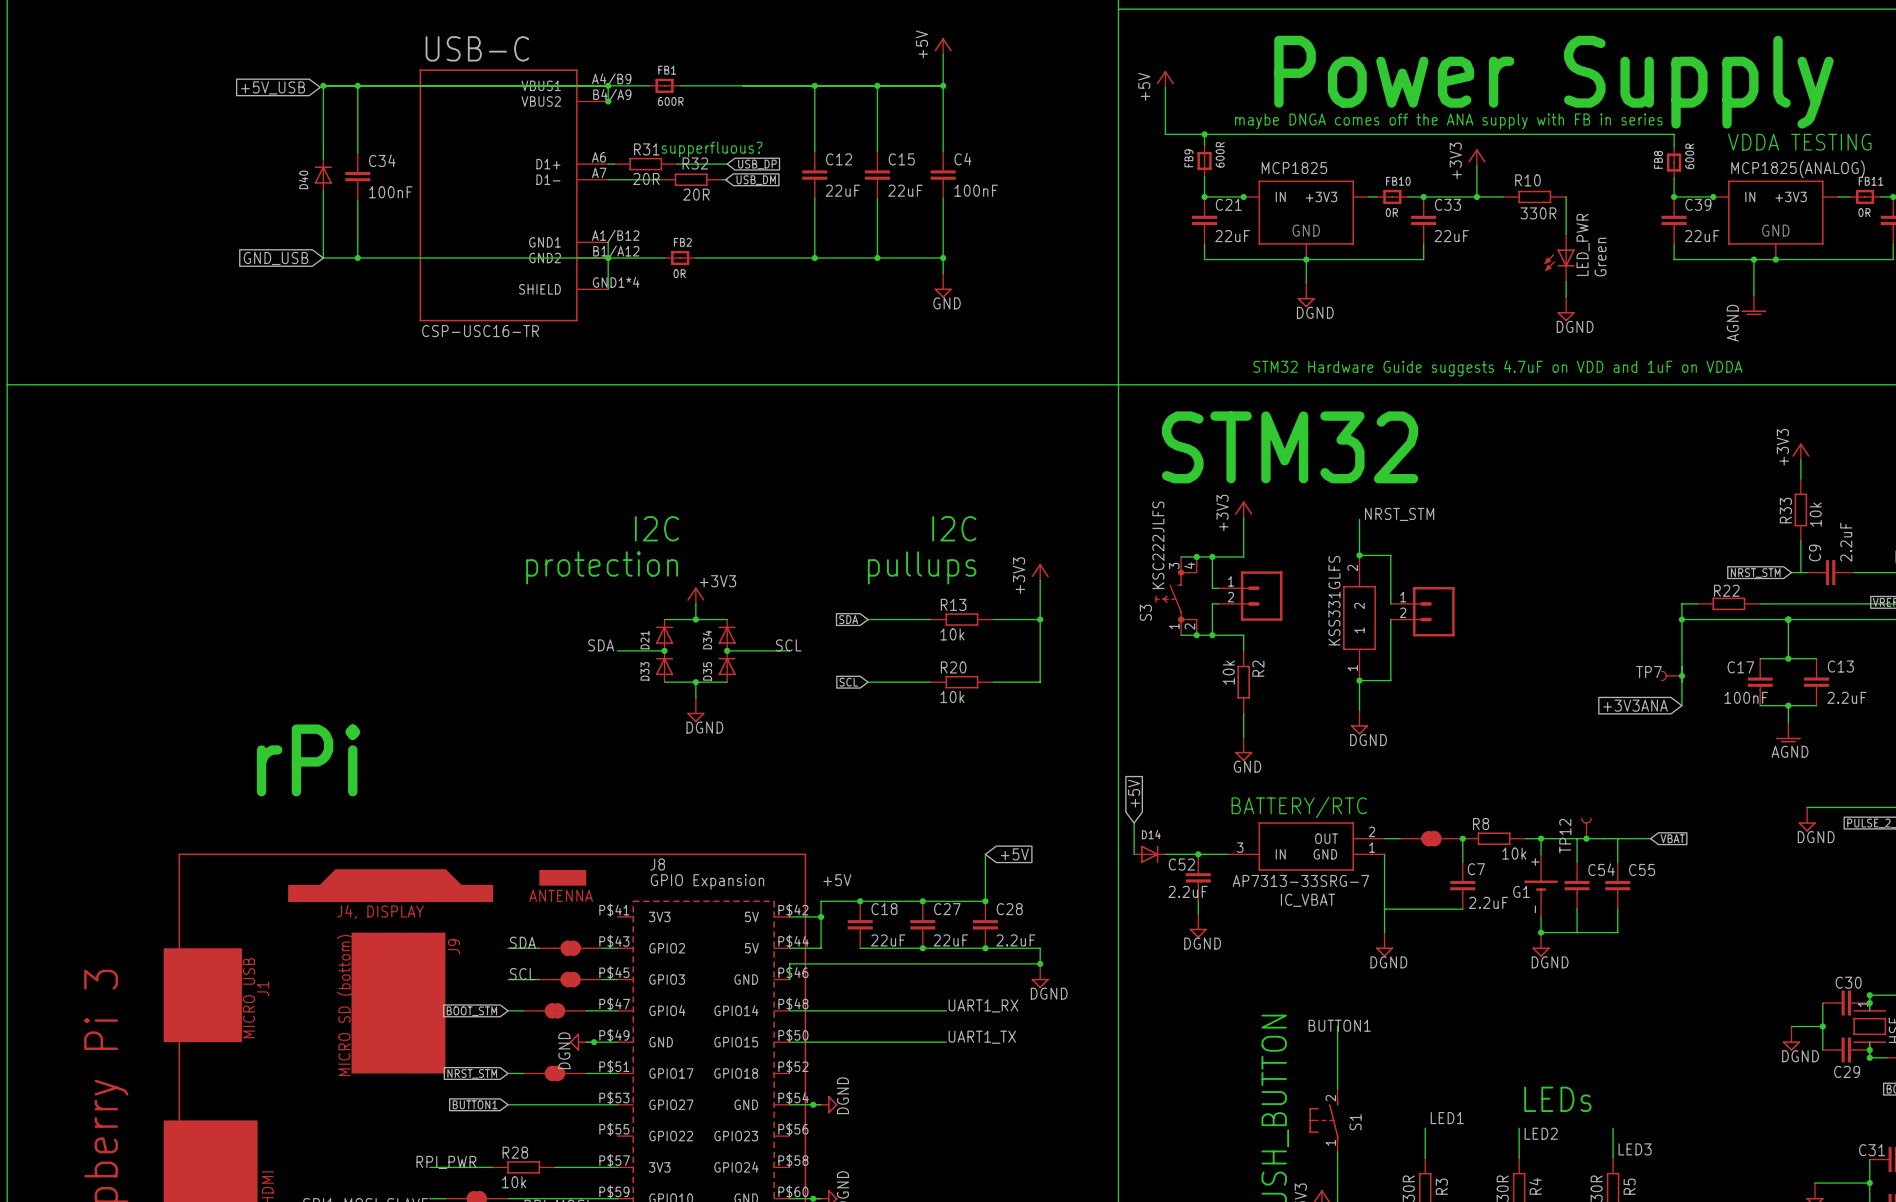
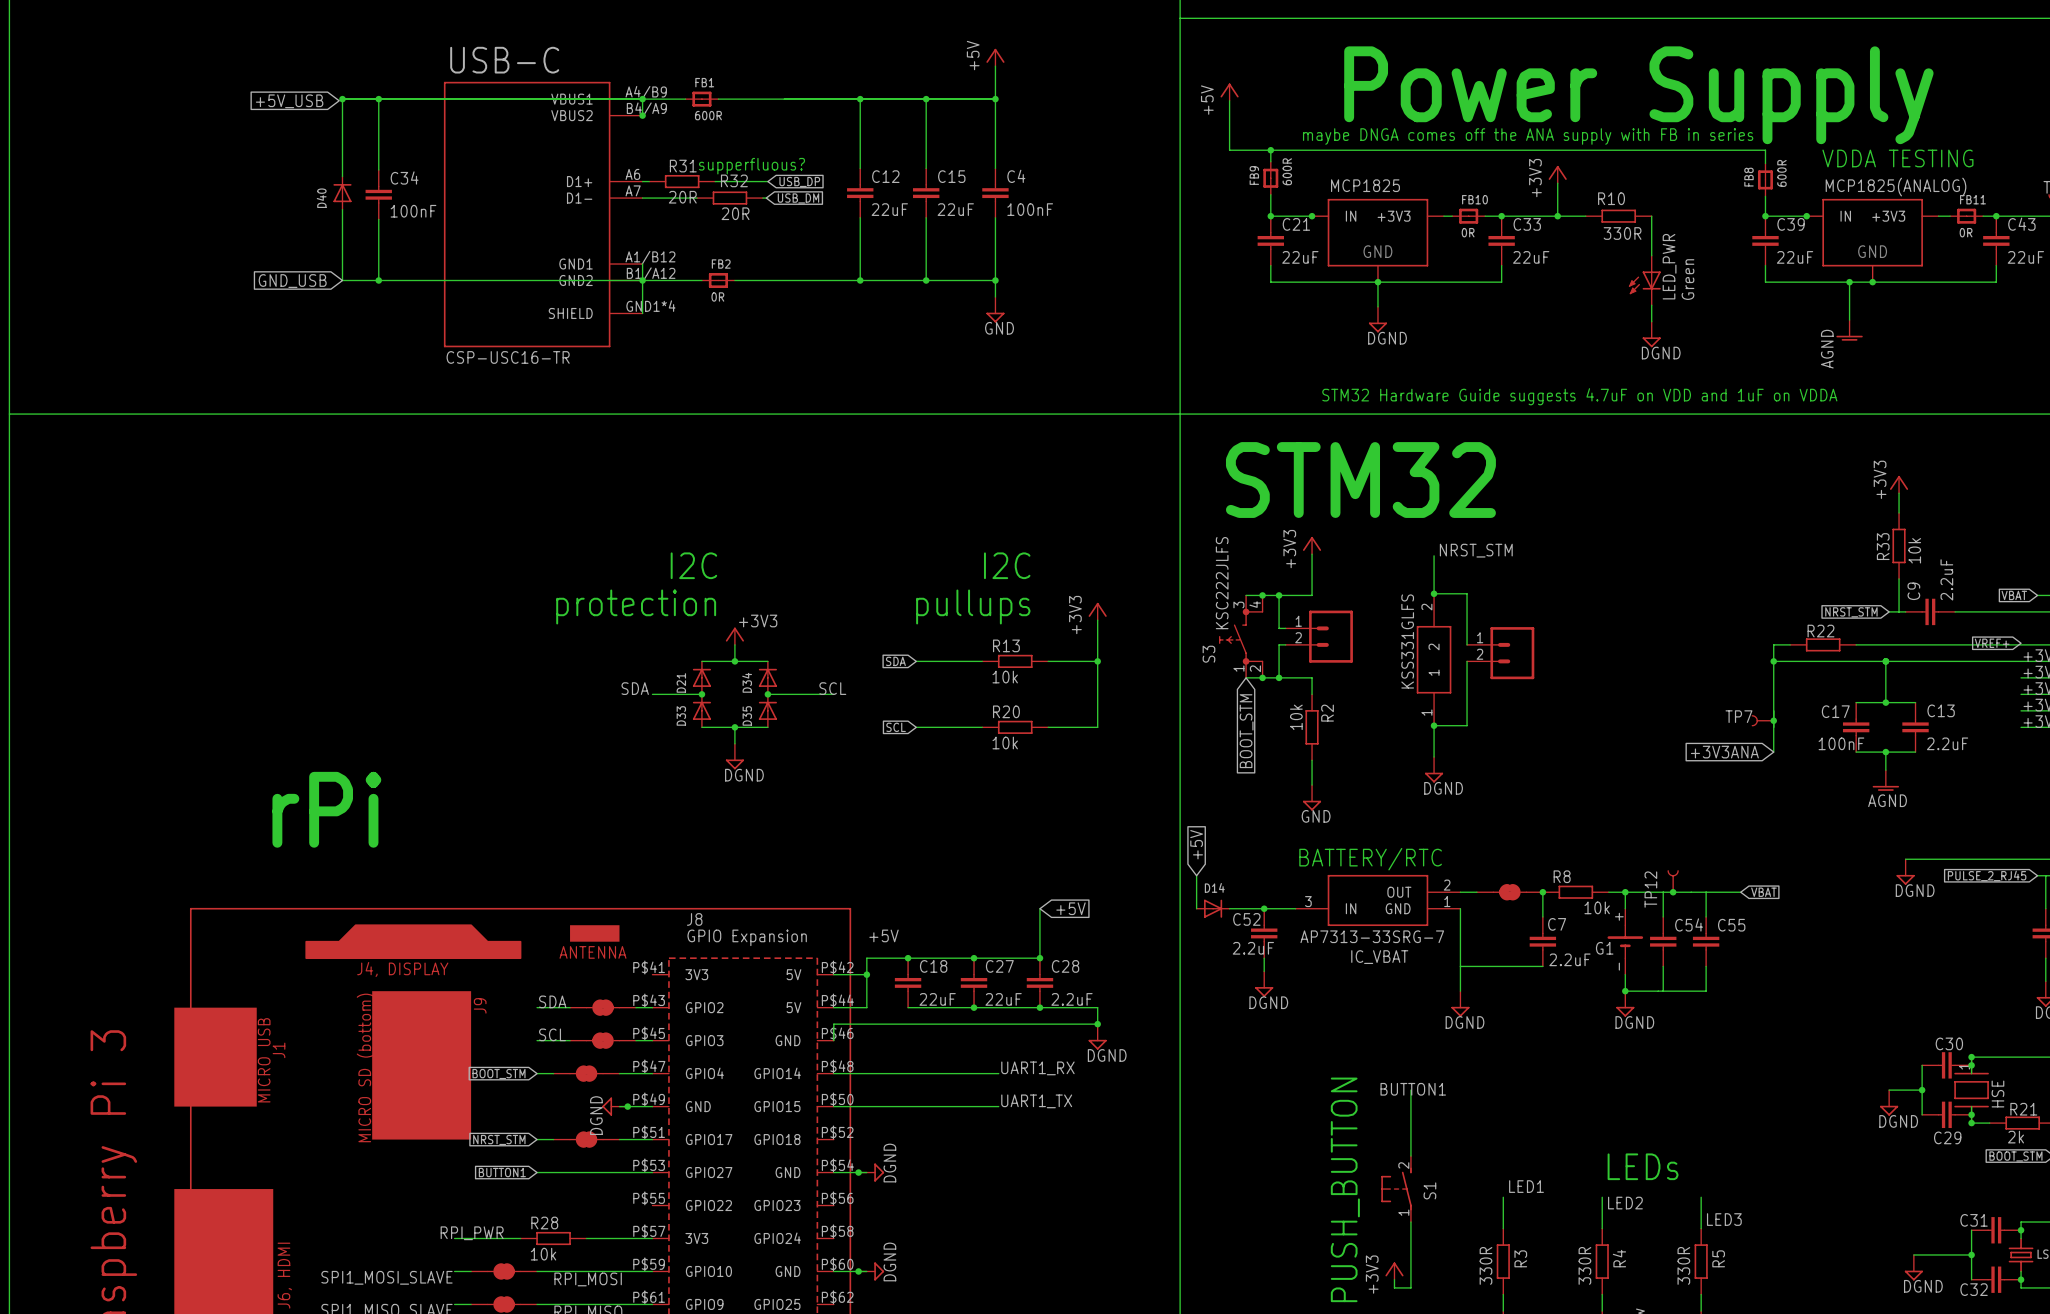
global label: none -> BOOT_STM (1246, 731)

